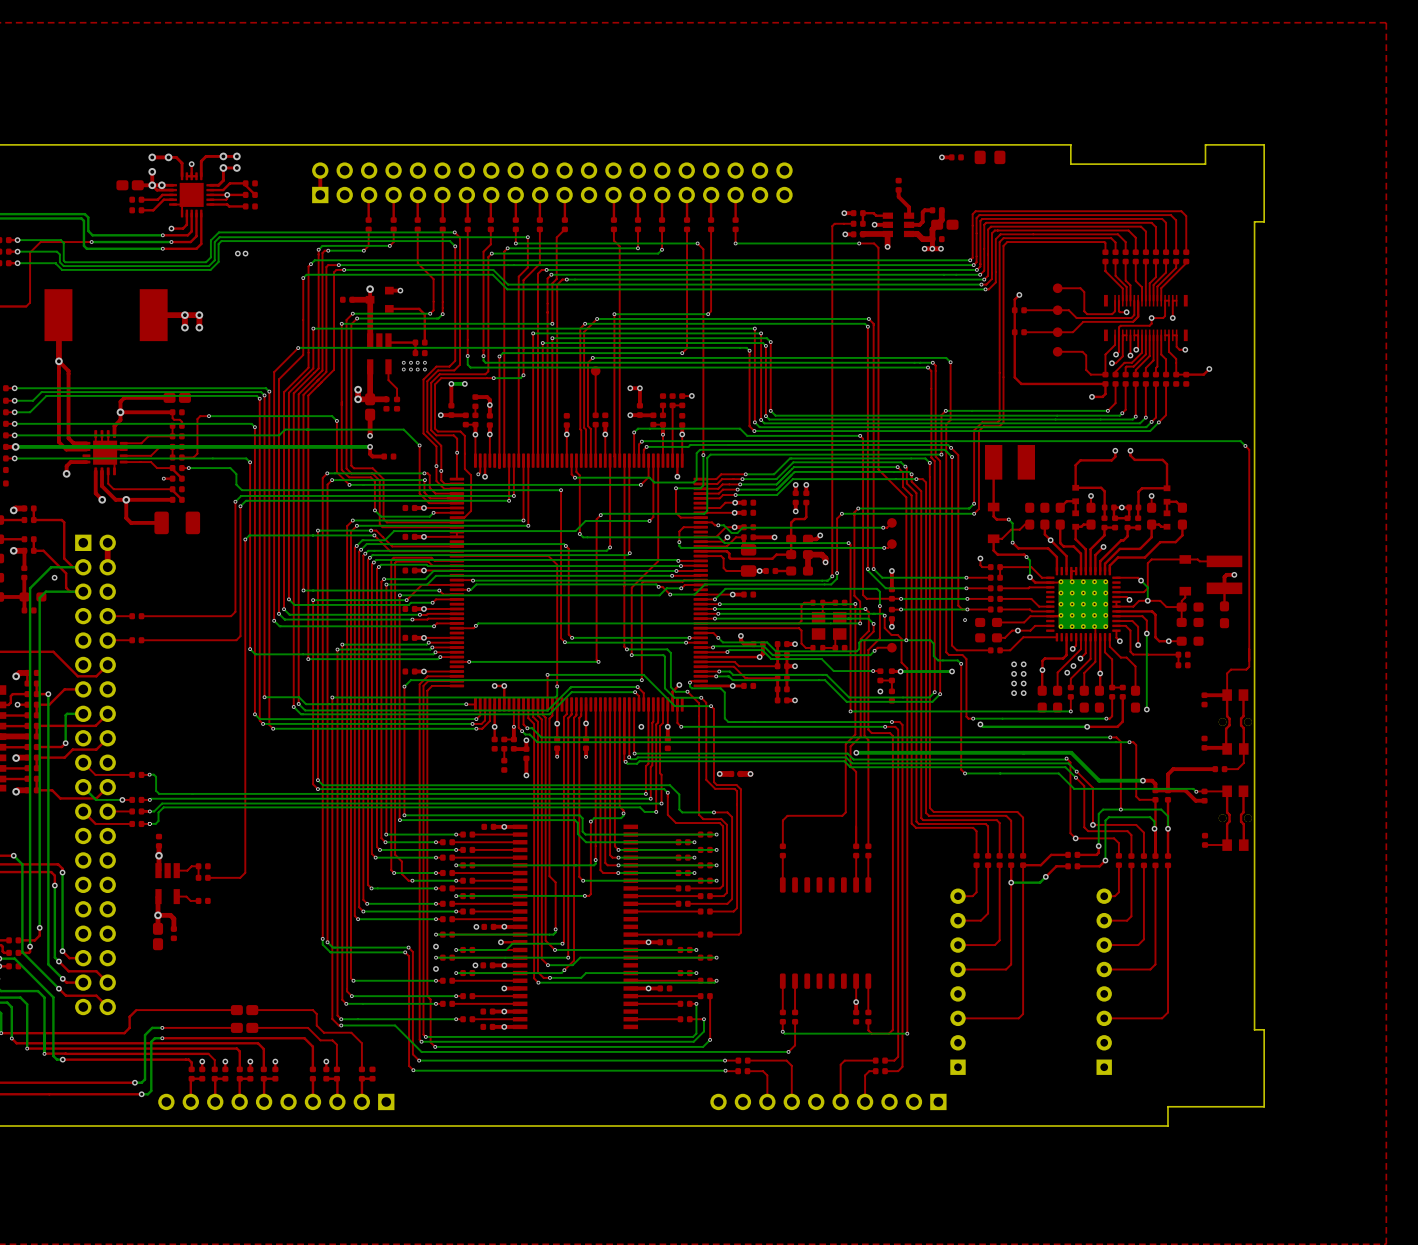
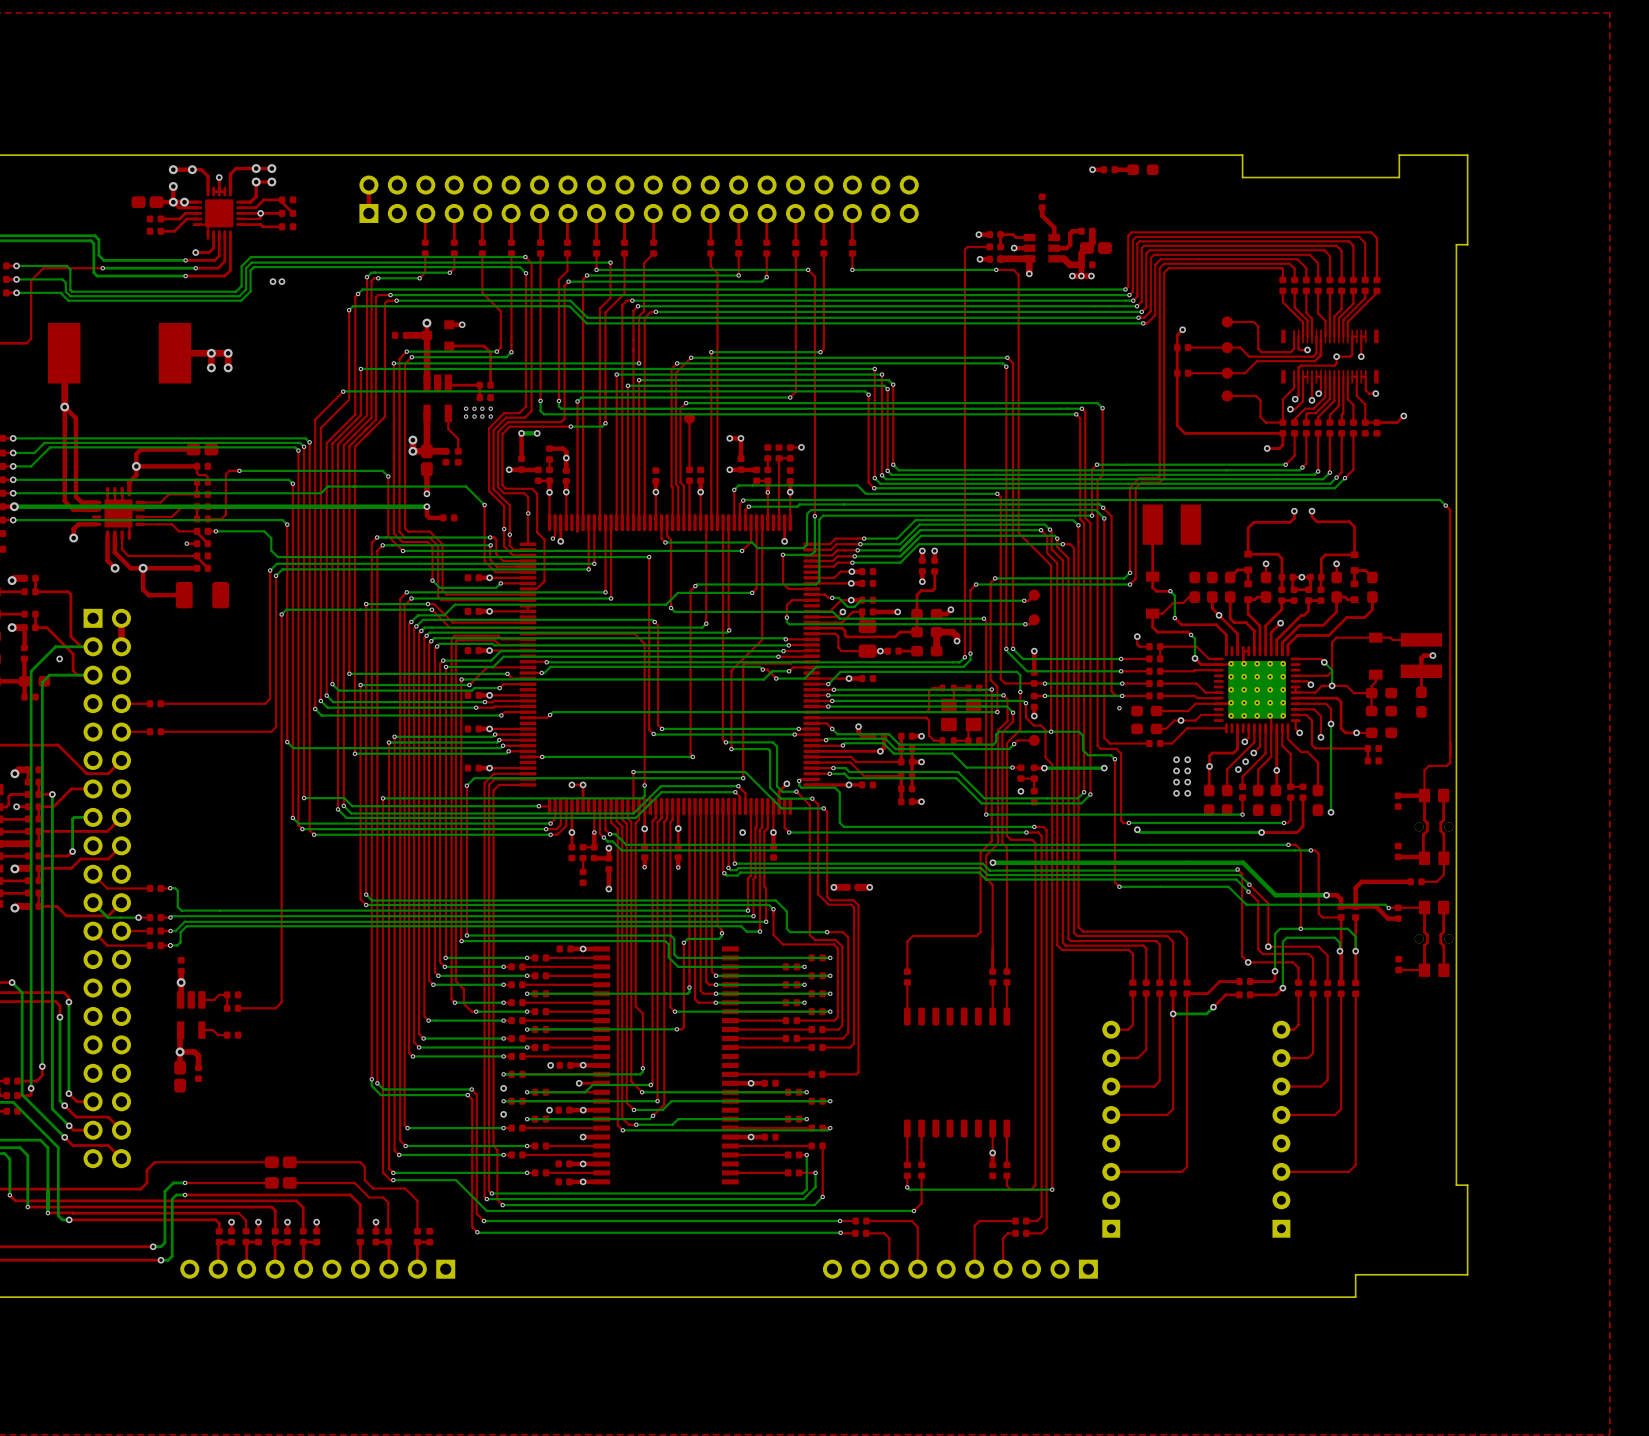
part footprint: [974, 150, 1006, 165] -> [1127, 164, 1159, 176]
top track: none -> (1133, 169) (1114, 169)

